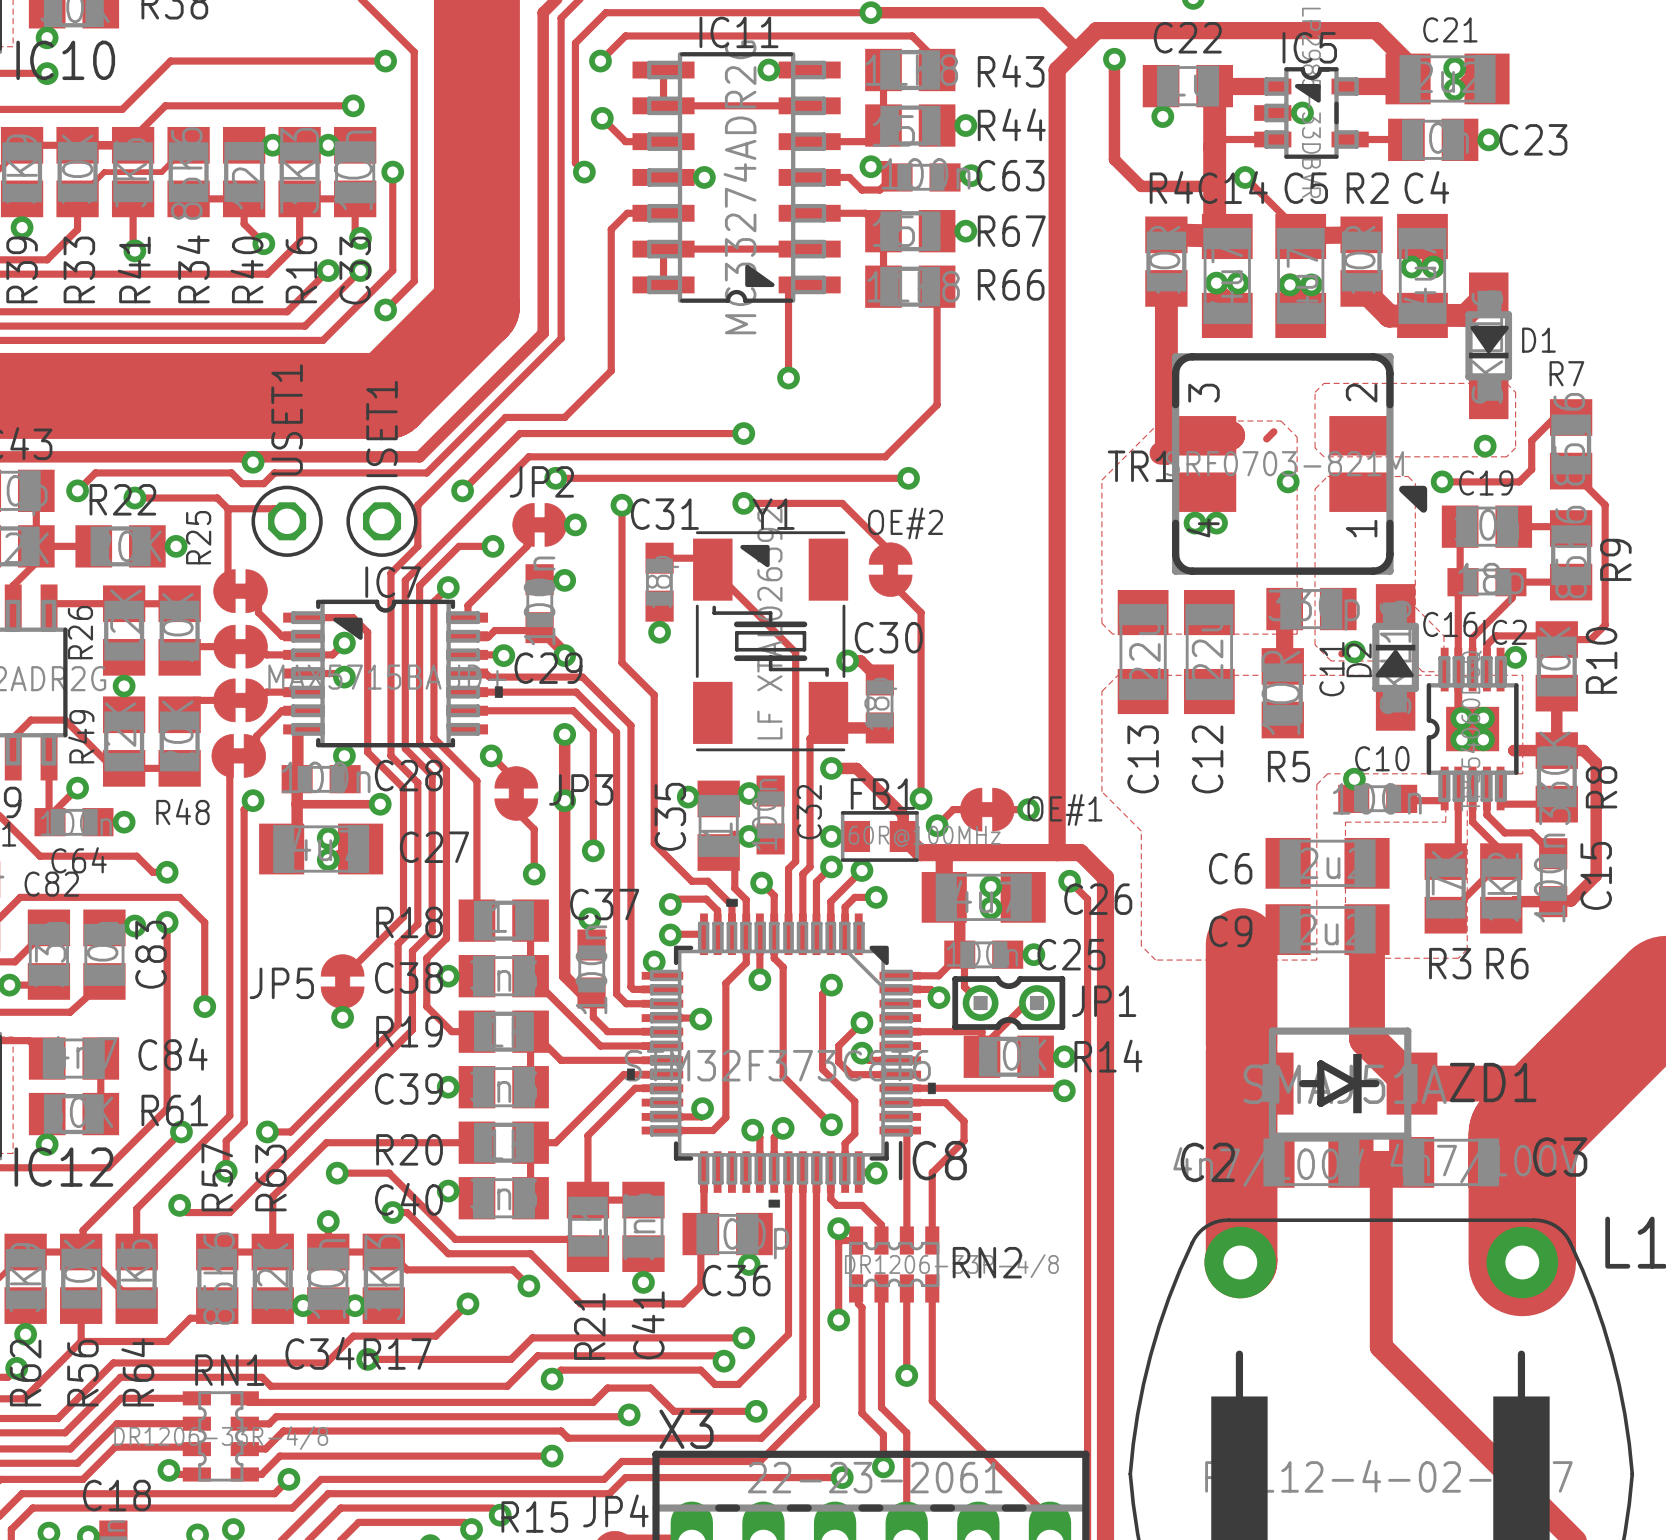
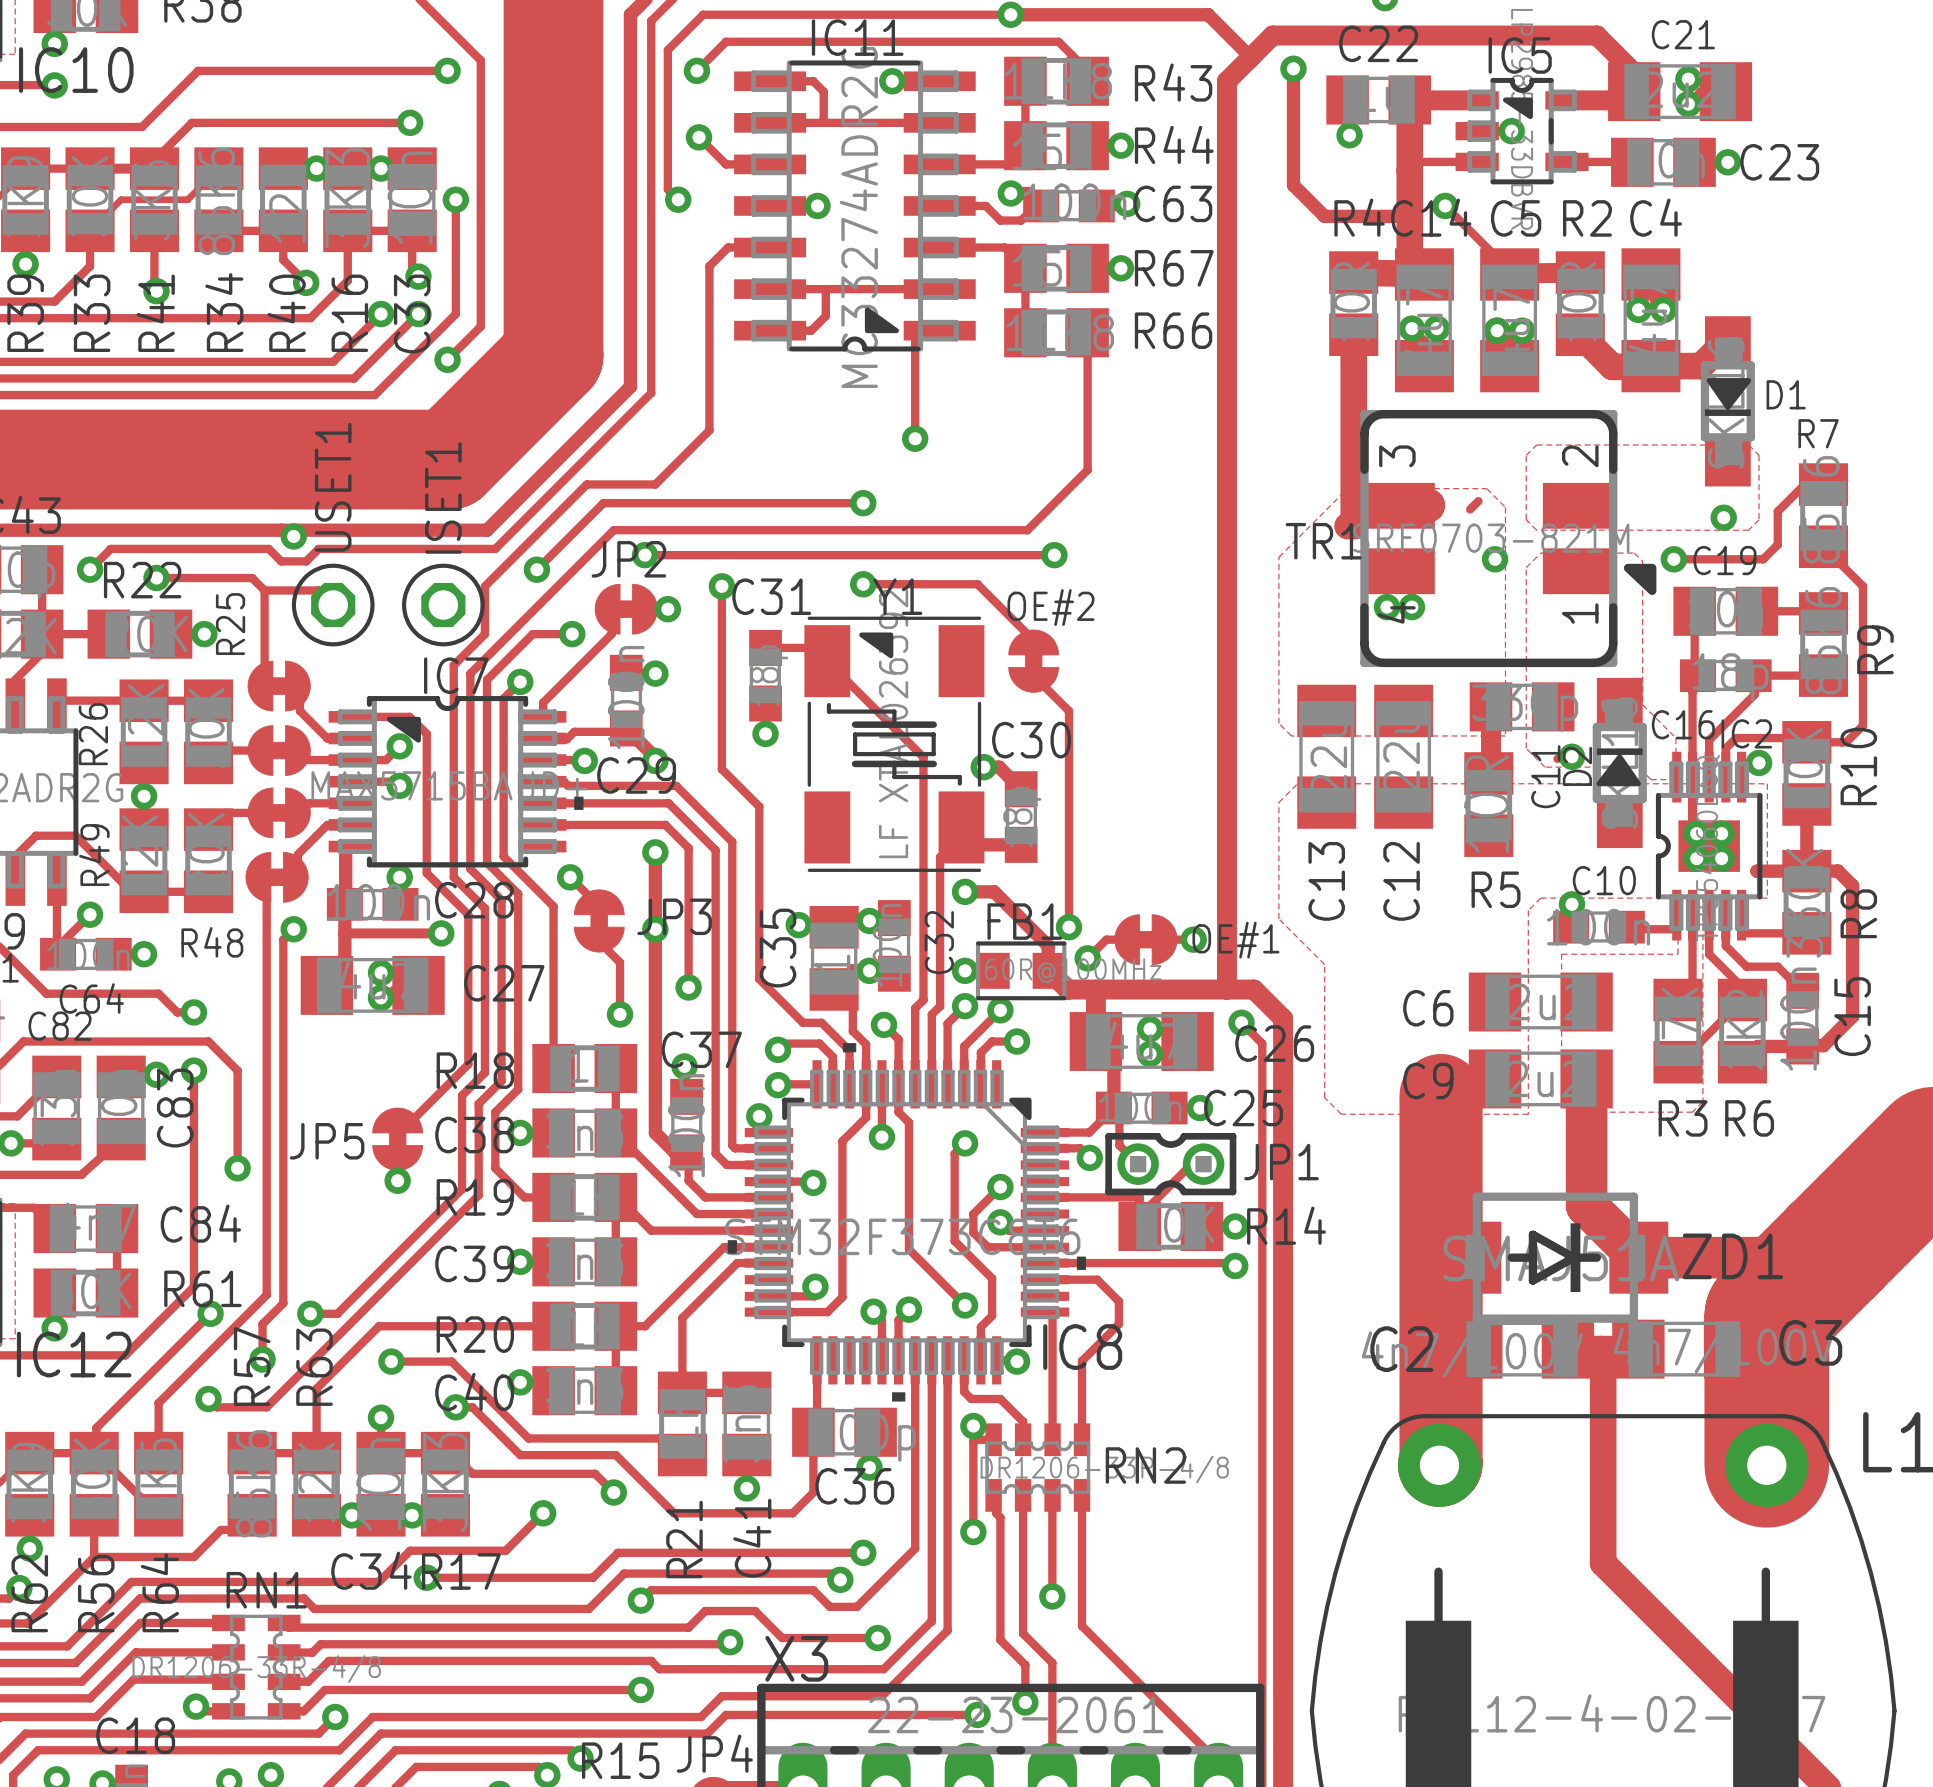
track: (663, 70) (663, 105) -> (770, 81) (813, 81) (823, 91) (823, 120) (821, 122)
track: (663, 249) (663, 284) -> (825, 289) (825, 316) (811, 330) (770, 330)

